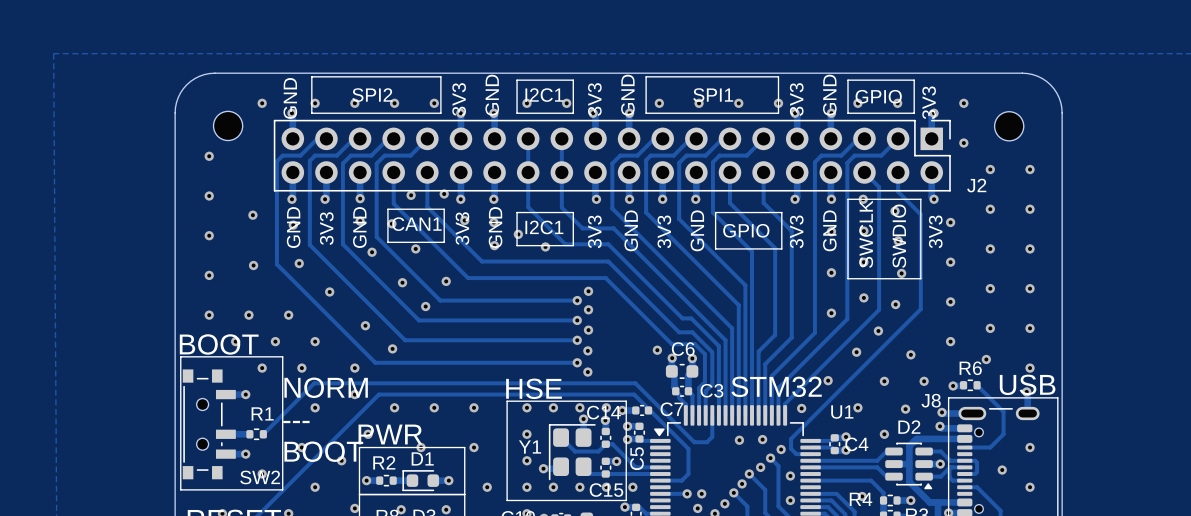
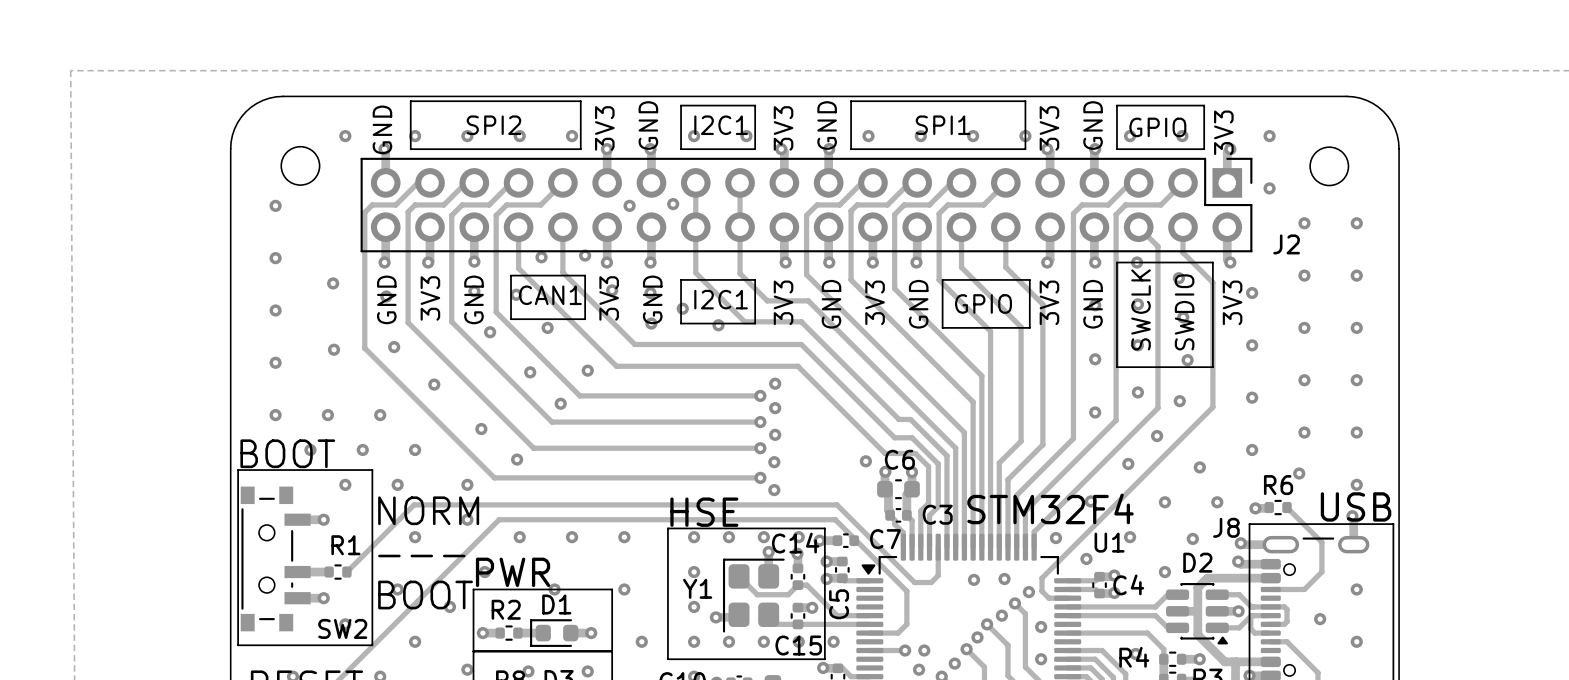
via: none -> (673, 204)
via: none -> (629, 205)
text: STM32 (776, 386) -> STM32F4 (1050, 508)
via: none -> (1086, 558)

